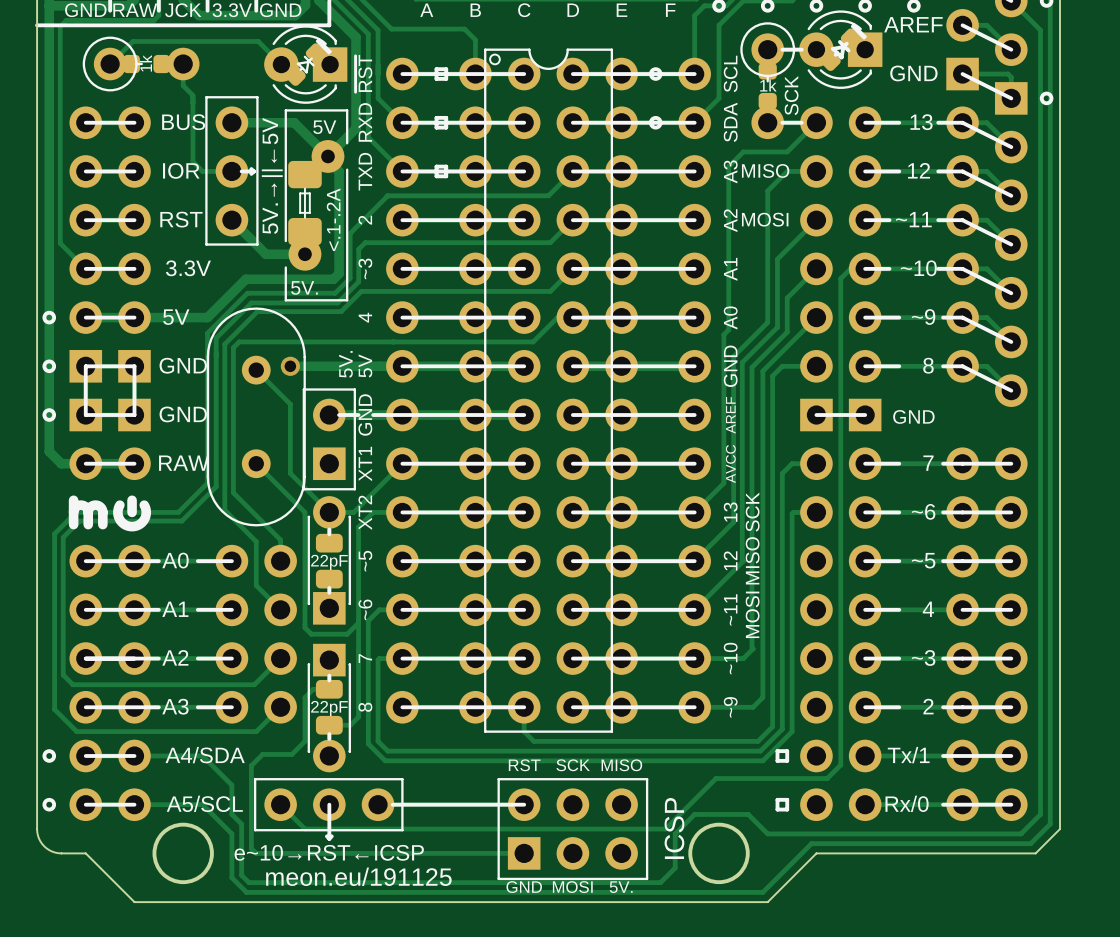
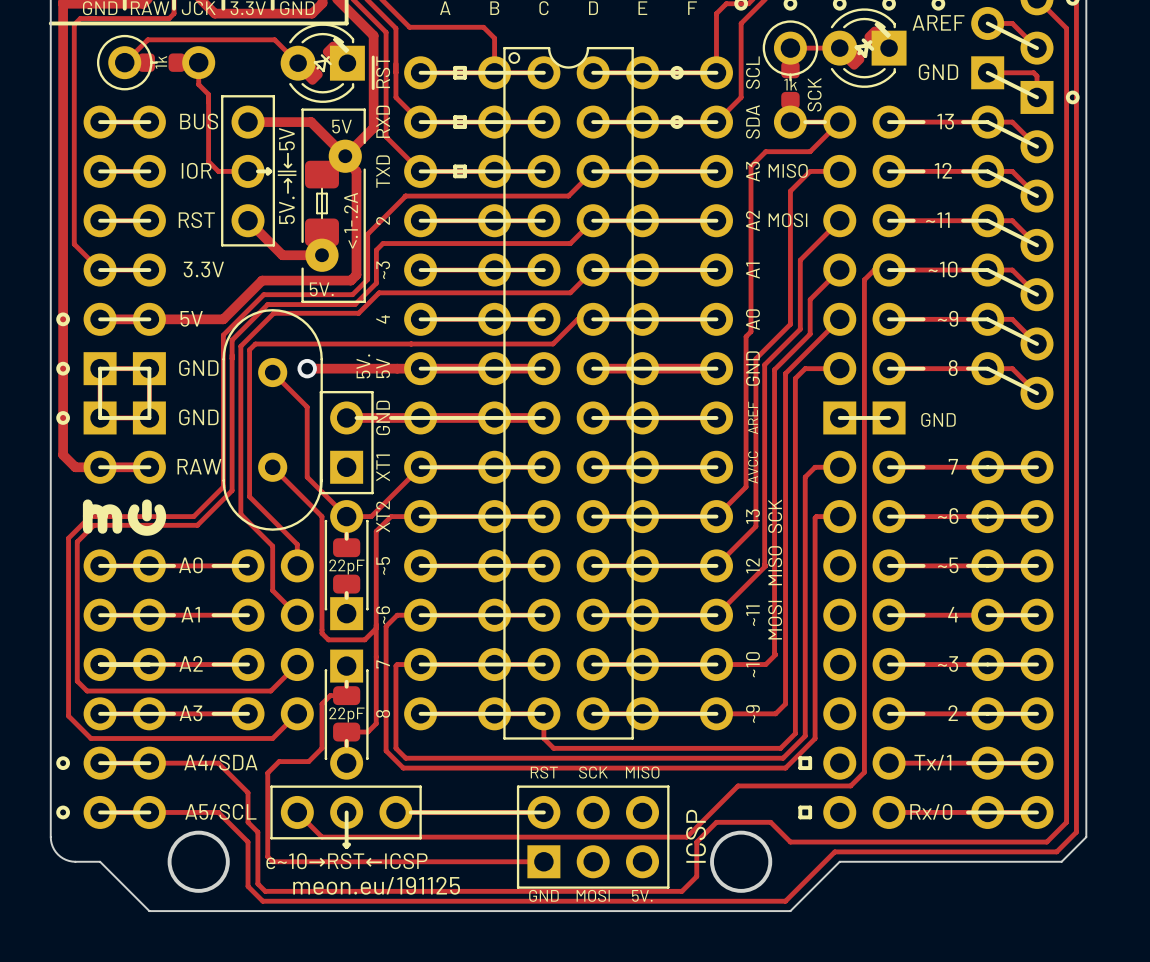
line: (782, 49) (801, 49) -> none

